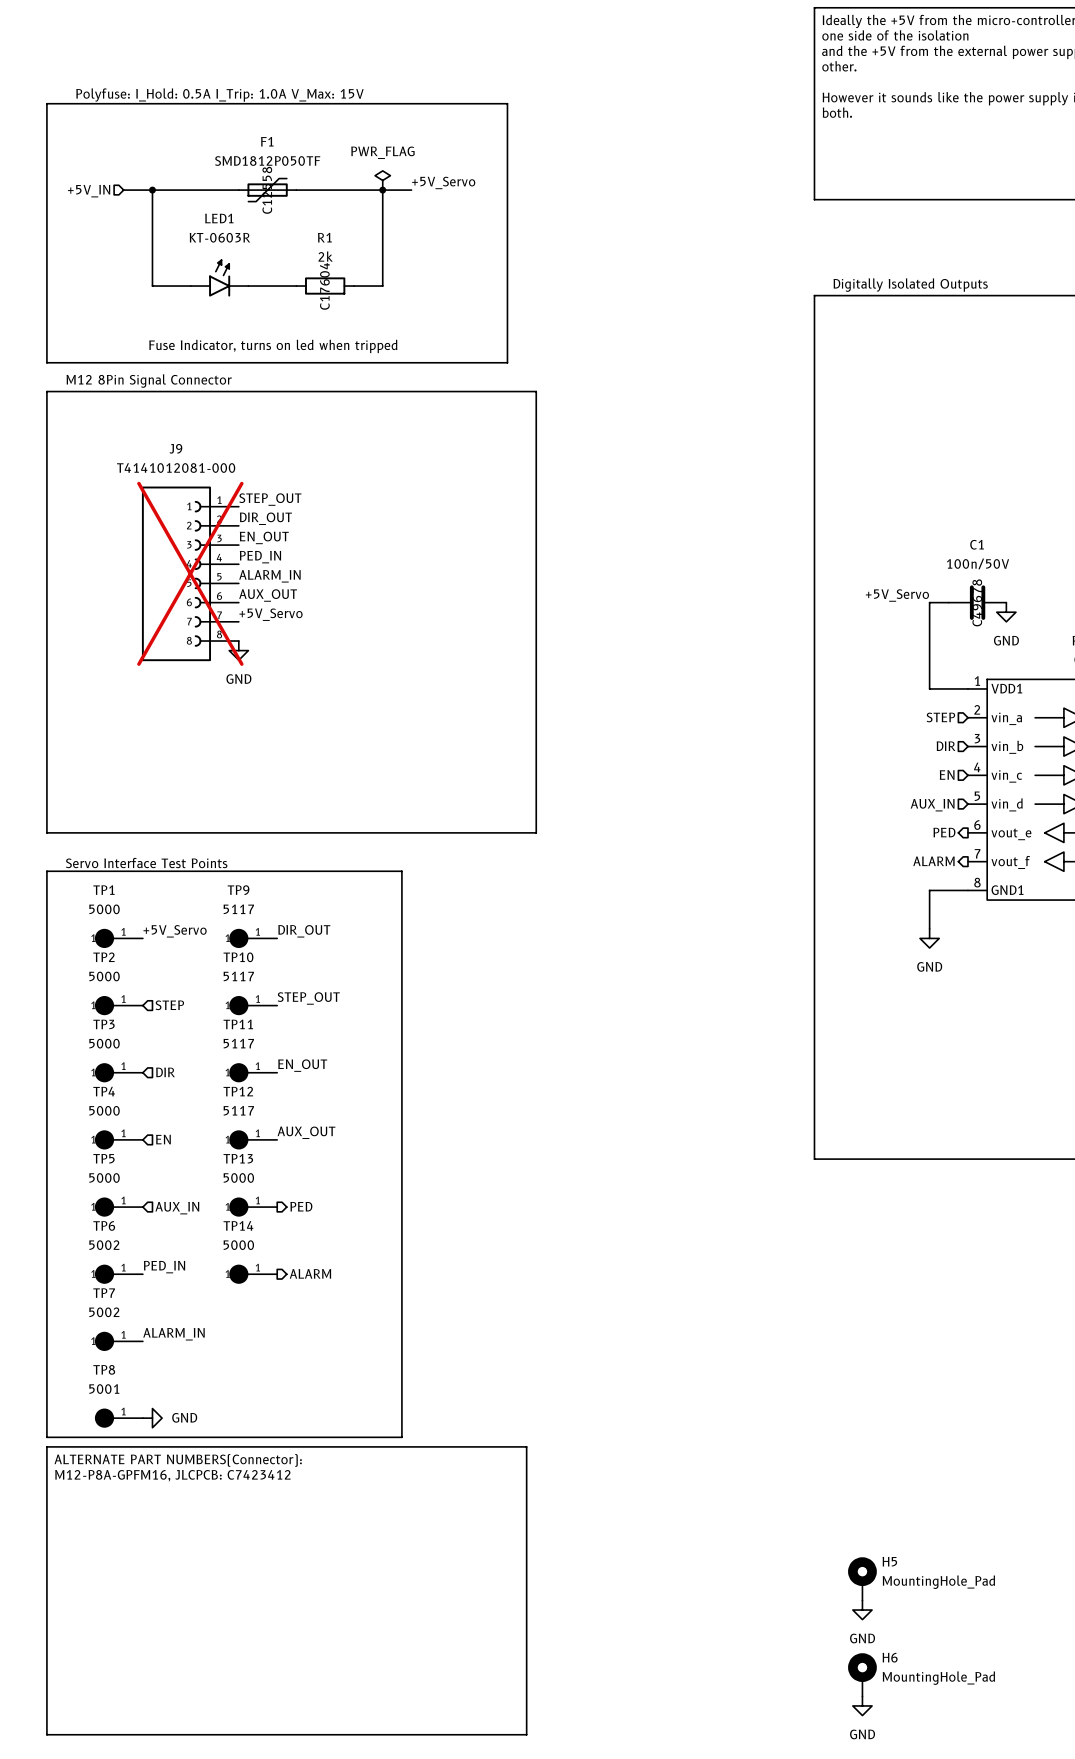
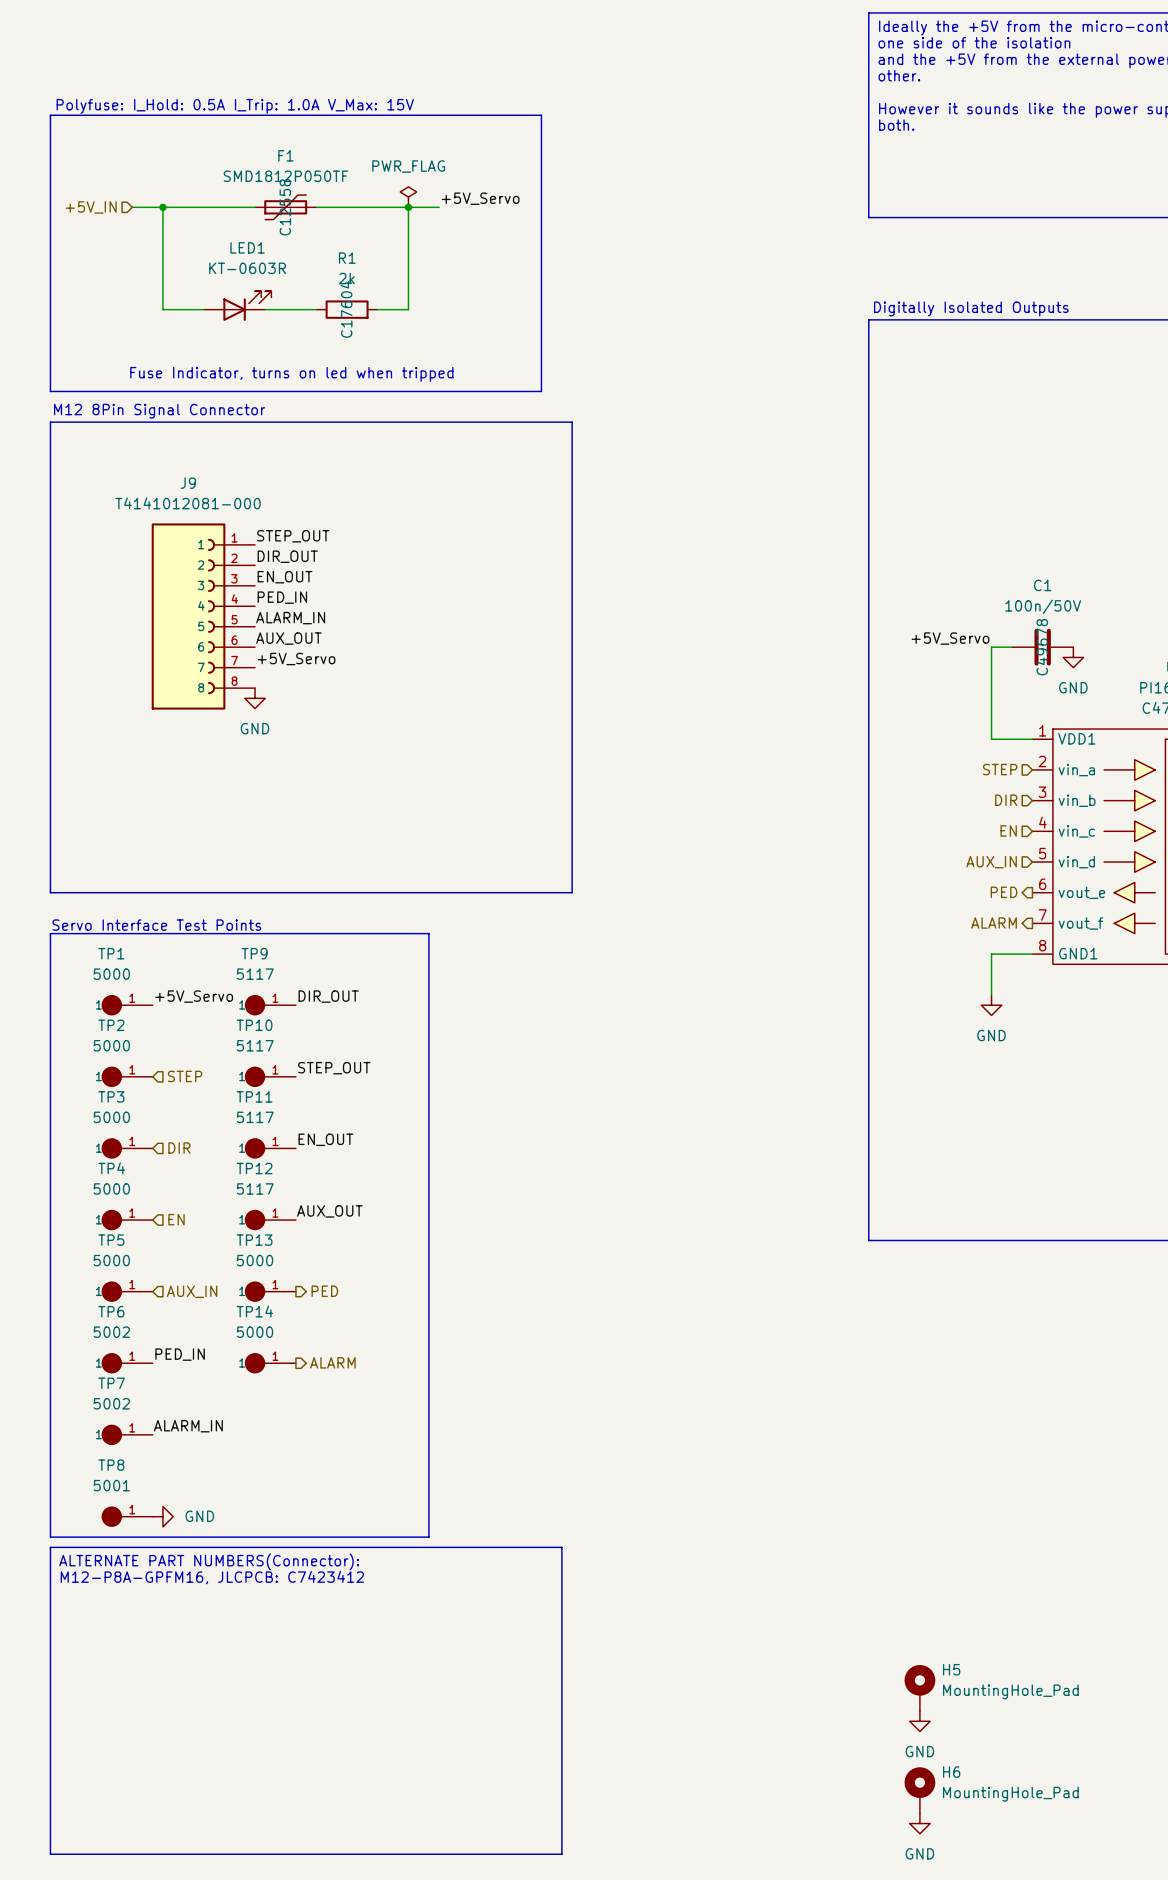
LED1 symbol: [190, 259, 249, 297] -> [203, 291, 272, 321]
J9 do-not-place cross: (190, 573) -> none

